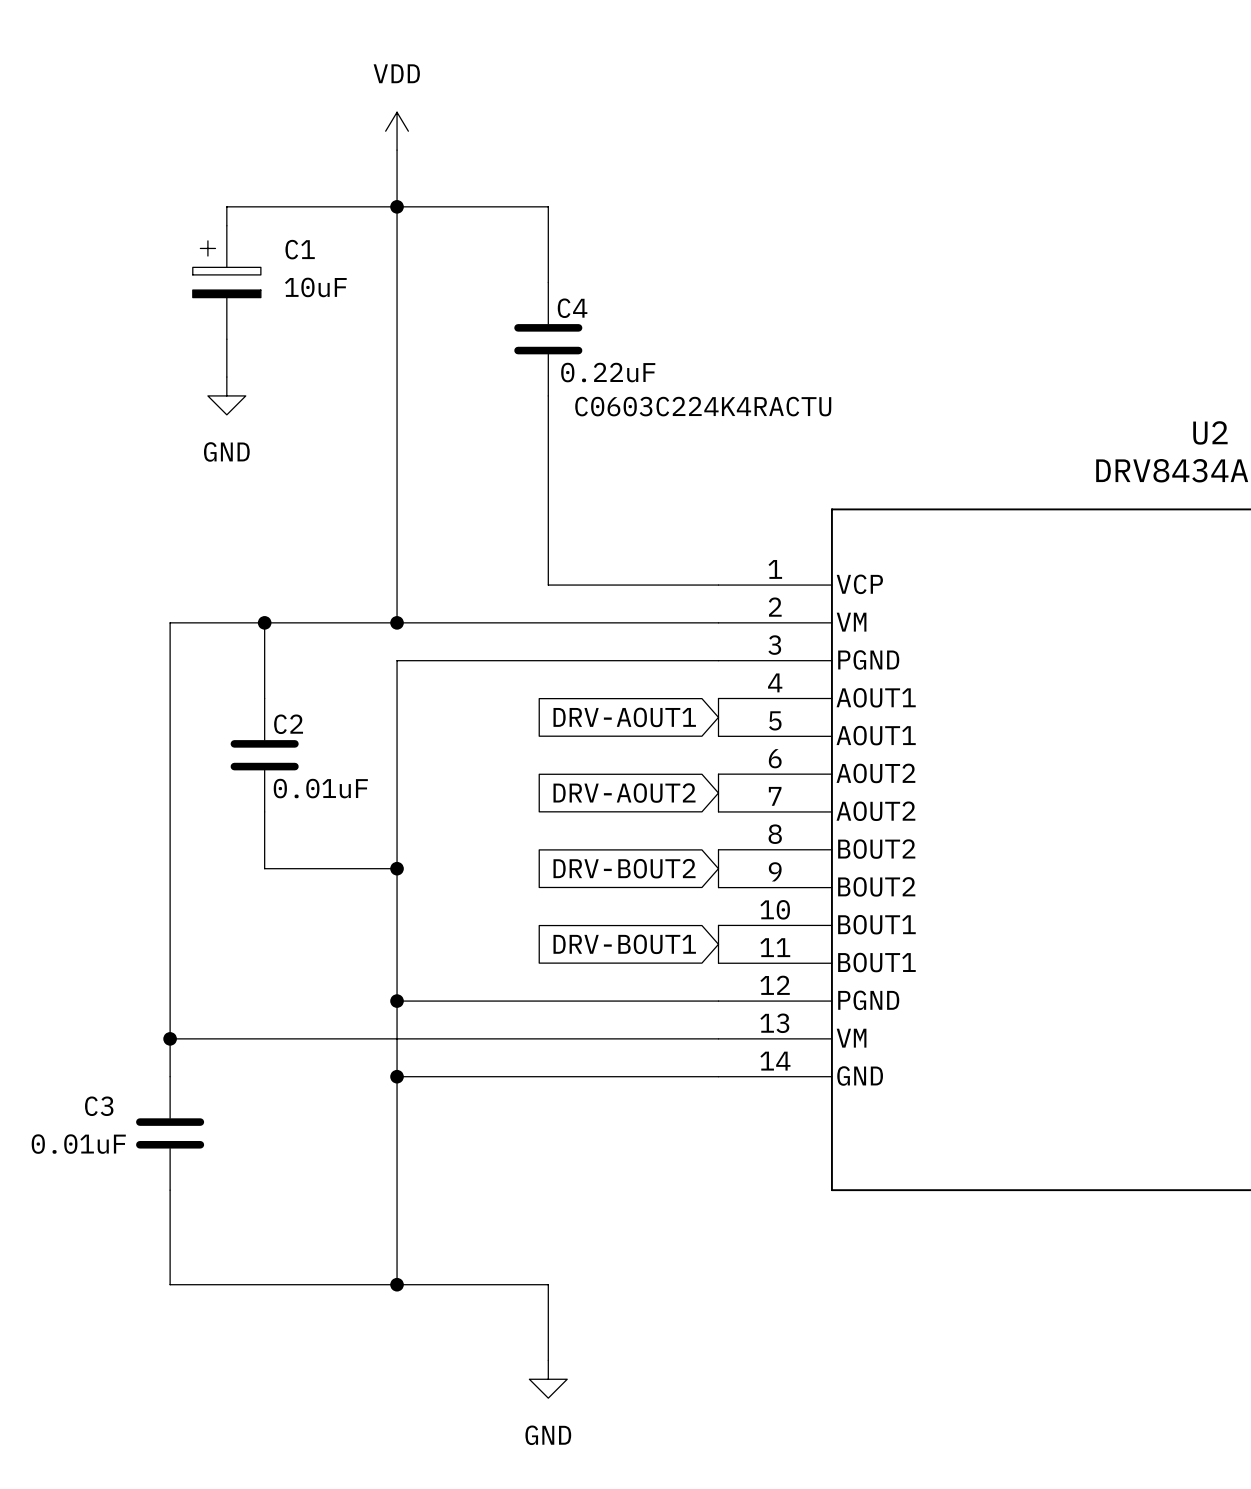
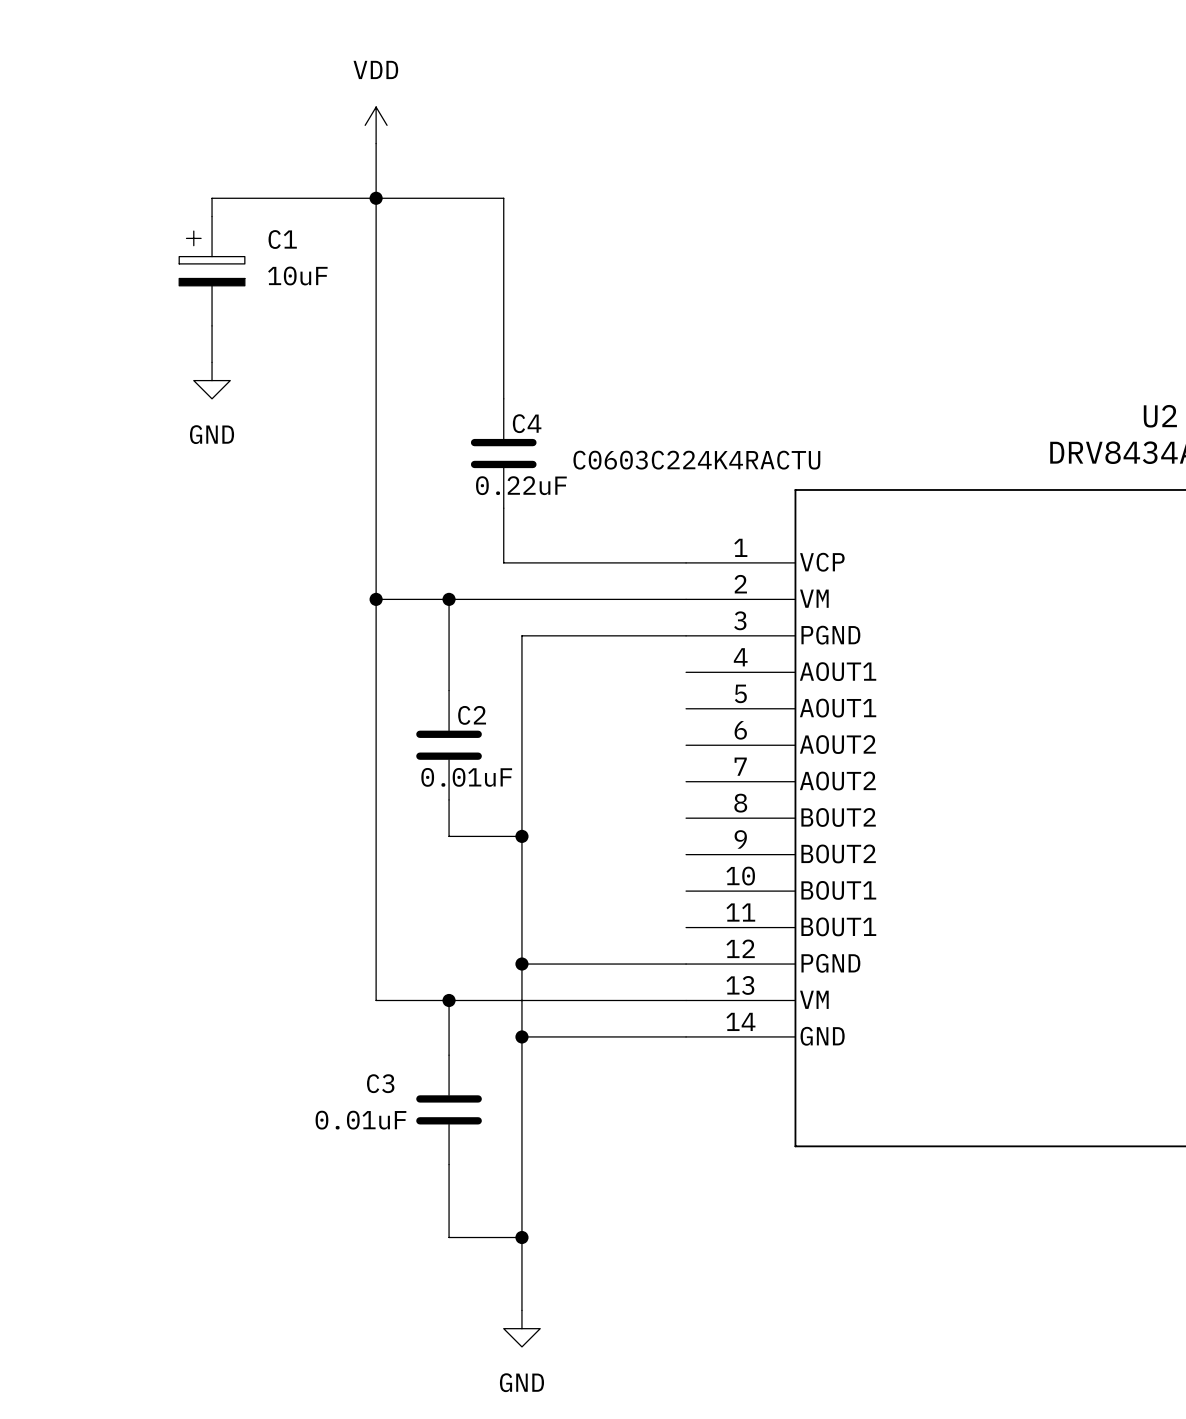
wire: (529, 206) (548, 206) (548, 282) -> (503, 198) (503, 398)
C4 position: (548, 339) -> (503, 453)
C4 value position: 0.22uF (608, 372) -> 0.22uF (521, 485)
wire: (548, 395) (548, 585) -> (503, 508) (503, 562) (521, 562)
C4 text position: C0603C224K4RACTU (703, 406) -> C0603C224K4RACTU (696, 460)
wire: (264, 622) (264, 698) -> none
junction: (264, 622) -> none
wire: (397, 622) (170, 622) (170, 1076) -> none
wire: none -> (449, 599) (449, 690)
junction: none -> (449, 599)
wire: (397, 660) (548, 660) -> (376, 635) (376, 599)
wire: none -> (521, 635) (521, 1237)
wire: (718, 698) (718, 736) -> none
global label: DRV-AOUT1 (624, 717) -> none
C2 position: (264, 755) -> (449, 745)
wire: (718, 774) (718, 811) -> none
C2 value position: 0.01uF (320, 788) -> 0.01uF (466, 777)
global label: DRV-AOUT2 (624, 793) -> none
wire: (264, 811) (264, 868) (397, 868) -> none
wire: none -> (449, 799) (449, 836) (521, 836)
wire: (718, 849) (718, 887) -> none
junction: (397, 868) -> none
junction: none -> (521, 836)
global label: DRV-BOUT2 (624, 868) -> none
wire: (718, 925) (718, 963) -> none
global label: DRV-BOUT1 (624, 944) -> none
wire: (397, 1001) (548, 1001) -> none
junction: (397, 1001) -> none
junction: none -> (521, 964)
wire: (170, 1038) (397, 1038) (397, 1284) -> none
junction: (170, 1038) -> none
wire: none -> (449, 1000) (449, 1055)
junction: none -> (449, 1000)
wire: (397, 1076) (548, 1076) -> none
junction: (397, 1076) -> none
junction: none -> (521, 1036)
C3 position: (170, 1133) -> (449, 1109)
wire: (170, 1190) (170, 1284) (472, 1284) -> (449, 1164) (449, 1237)
junction: (397, 1284) -> none
junction: none -> (521, 1237)

